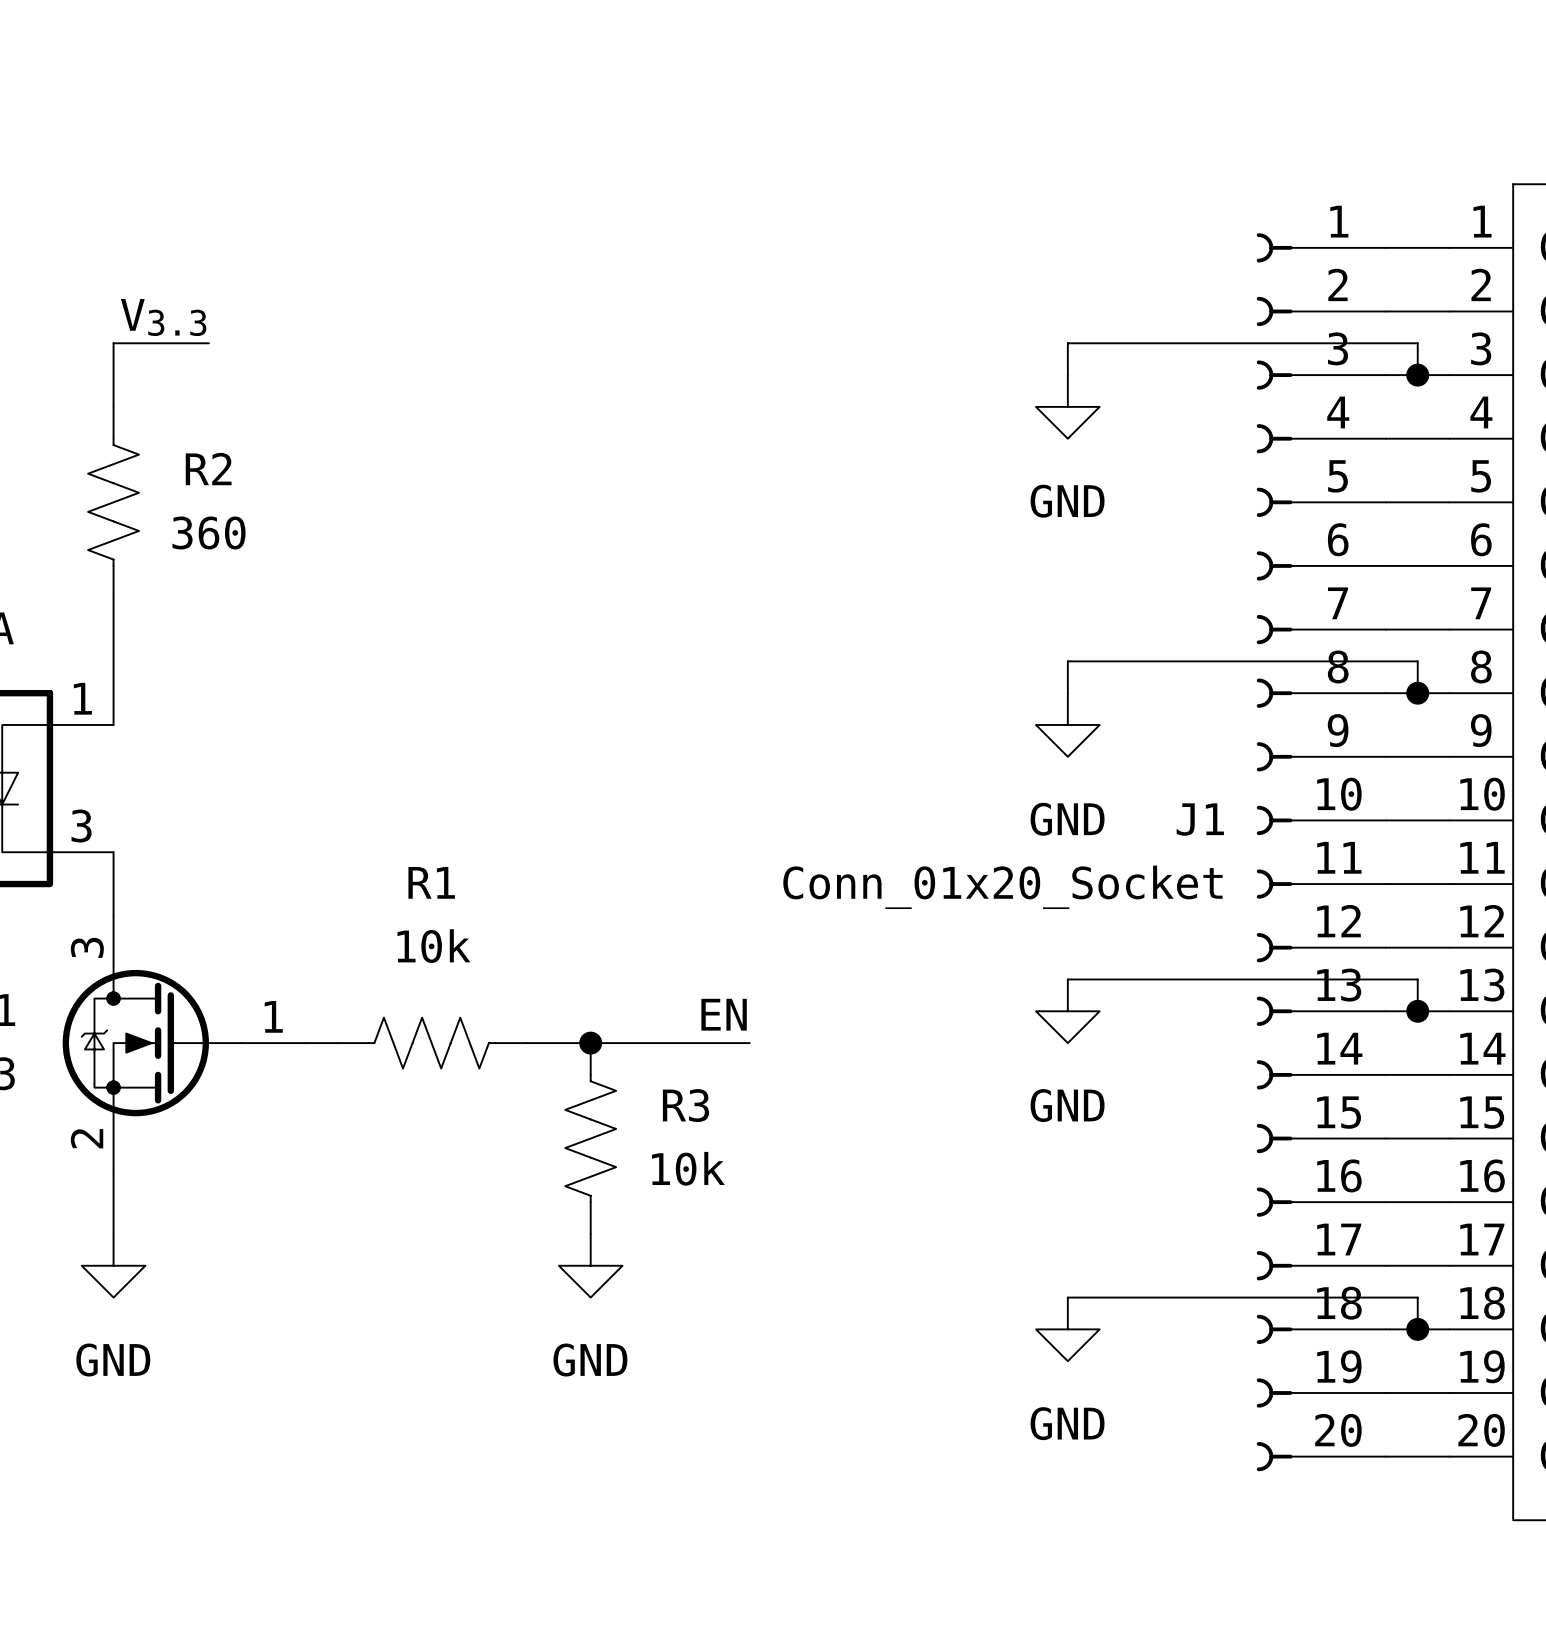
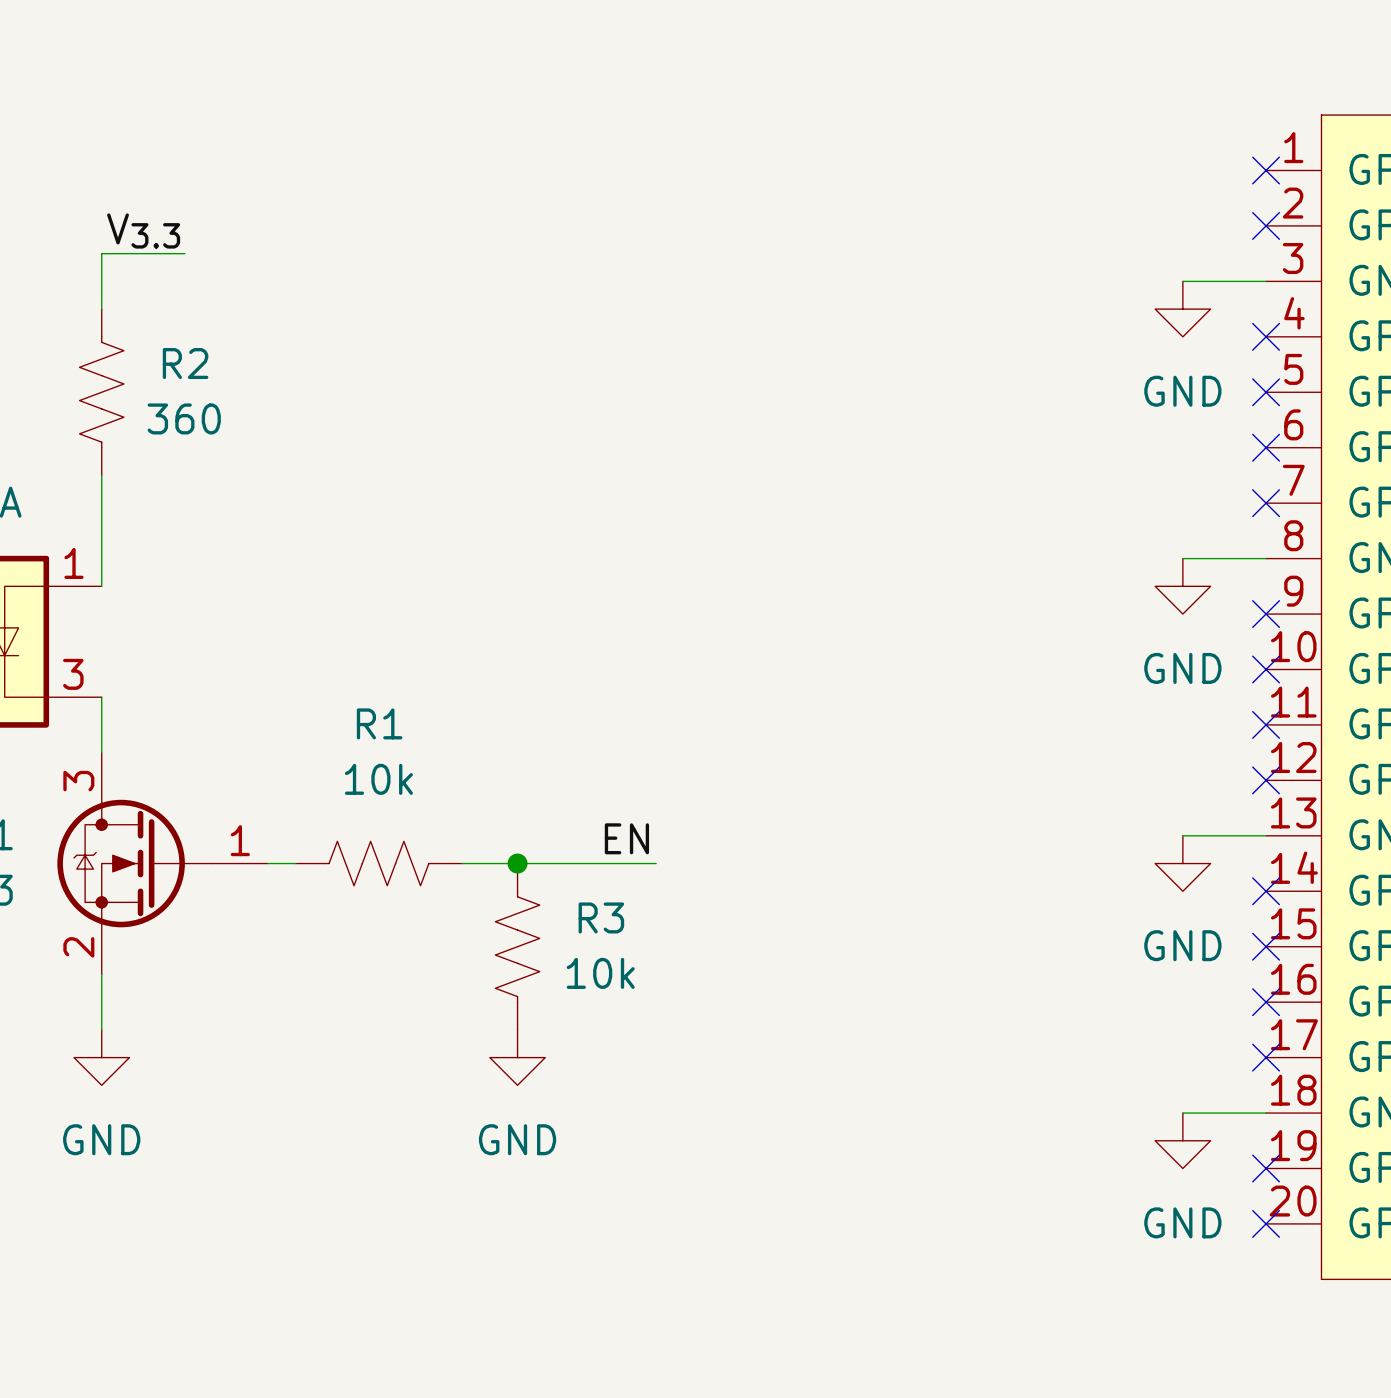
wire: (1385, 247) (1449, 247) -> none
no-connect mark: none -> (1266, 170)
wire: (1385, 311) (1449, 311) -> none
no-connect mark: none -> (1266, 225)
wire: (1067, 375) (1067, 343) (1417, 343) (1417, 375) -> none
junction: (1417, 375) -> none
power symbol: GND (1067, 406) -> none
power symbol: none -> GND (1182, 309)
wire: (1385, 438) (1449, 438) -> none
no-connect mark: none -> (1266, 336)
wire: (1385, 502) (1449, 502) -> none
no-connect mark: none -> (1266, 392)
wire: (1385, 565) (1449, 565) -> none
no-connect mark: none -> (1266, 447)
wire: (1385, 629) (1449, 629) -> none
no-connect mark: none -> (1266, 503)
wire: (1067, 693) (1067, 661) (1417, 661) (1417, 693) -> none
junction: (1417, 693) -> none
power symbol: GND (1067, 725) -> none
power symbol: none -> GND (1182, 586)
wire: (1385, 756) (1449, 756) -> none
no-connect mark: none -> (1266, 614)
wire: (1385, 820) (1449, 820) -> none
no-connect mark: none -> (1266, 669)
J1: Conn_01x20_Socket (1321, 852) -> none
wire: (1385, 884) (1449, 884) -> none
no-connect mark: none -> (1266, 724)
wire: (1385, 947) (1449, 947) -> none
no-connect mark: none -> (1266, 780)
wire: (1067, 979) (1417, 979) (1417, 1011) -> none
power symbol: GND (1067, 1011) -> none
junction: (1417, 1011) -> none
power symbol: none -> GND (1182, 863)
wire: (1385, 1074) (1449, 1074) -> none
no-connect mark: none -> (1266, 891)
wire: (1385, 1138) (1449, 1138) -> none
no-connect mark: none -> (1266, 946)
wire: (1385, 1202) (1449, 1202) -> none
no-connect mark: none -> (1266, 1002)
wire: (1385, 1265) (1449, 1265) -> none
no-connect mark: none -> (1266, 1057)
wire: (1067, 1297) (1417, 1297) (1417, 1329) -> none
power symbol: GND (1067, 1329) -> none
junction: (1417, 1329) -> none
power symbol: none -> GND (1182, 1140)
wire: (1385, 1392) (1449, 1392) -> none
no-connect mark: none -> (1266, 1168)
wire: (1385, 1456) (1449, 1456) -> none
no-connect mark: none -> (1266, 1223)

